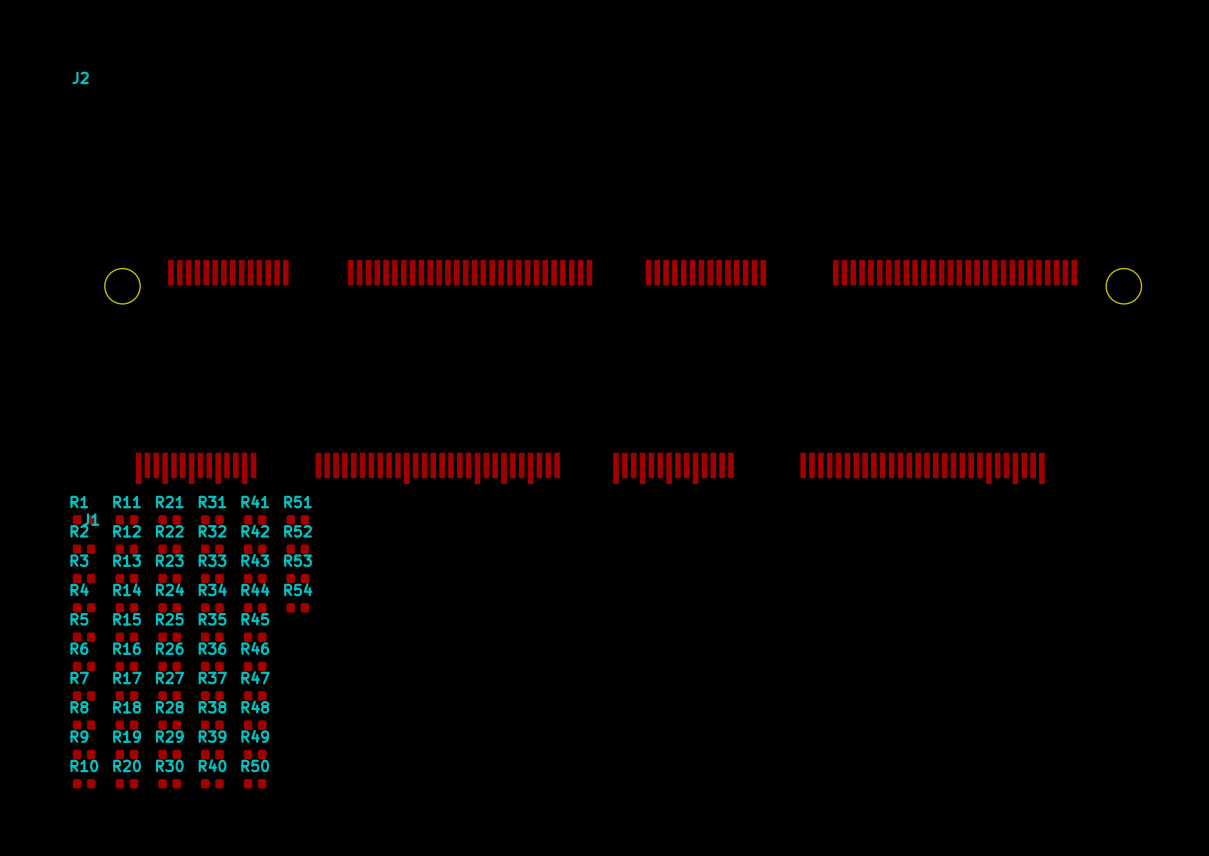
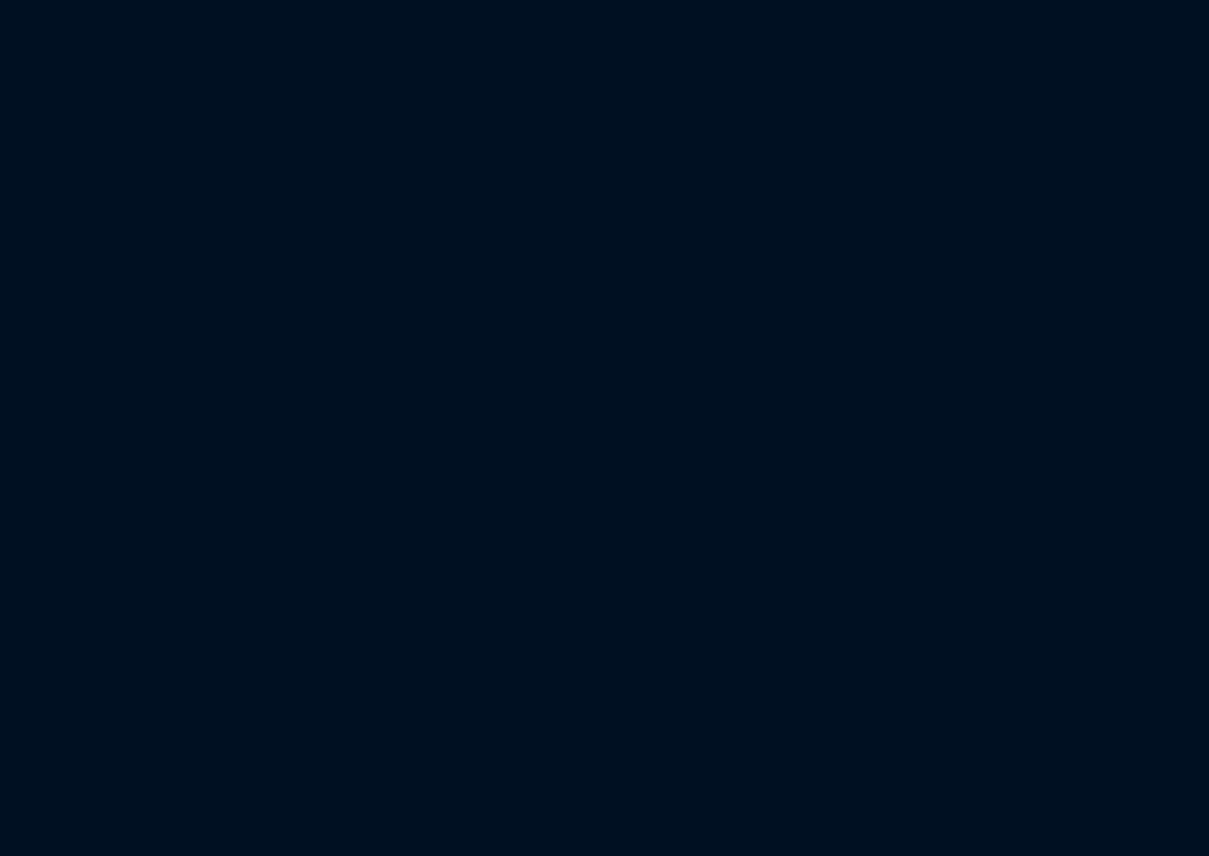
J2: (623, 281) -> none
J1: (590, 468) -> none
R1: (84, 519) -> none
R11: (126, 519) -> none
R21: (169, 519) -> none
R31: (212, 519) -> none
R41: (255, 519) -> none
R51: (297, 519) -> none
R2: (84, 549) -> none
R12: (126, 549) -> none
R22: (169, 549) -> none
R32: (212, 549) -> none
R42: (255, 549) -> none
R52: (297, 549) -> none
R3: (84, 578) -> none
R13: (126, 578) -> none
R23: (169, 578) -> none
R33: (212, 578) -> none
R43: (255, 578) -> none
R53: (297, 578) -> none
R4: (84, 607) -> none
R14: (126, 607) -> none
R24: (169, 607) -> none
R34: (212, 607) -> none
R44: (255, 607) -> none
R54: (297, 607) -> none
R5: (84, 637) -> none
R15: (126, 637) -> none
R25: (169, 637) -> none
R35: (212, 637) -> none
R45: (255, 637) -> none
R6: (84, 666) -> none
R16: (126, 666) -> none
R26: (169, 666) -> none
R36: (212, 666) -> none
R46: (255, 666) -> none
R7: (84, 695) -> none
R17: (126, 695) -> none
R27: (169, 695) -> none
R37: (212, 695) -> none
R47: (255, 695) -> none
R8: (84, 725) -> none
R18: (126, 725) -> none
R28: (169, 725) -> none
R38: (212, 725) -> none
R48: (255, 725) -> none
R9: (84, 754) -> none
R19: (126, 754) -> none
R29: (169, 754) -> none
R39: (212, 754) -> none
R49: (255, 754) -> none
R10: (84, 783) -> none
R20: (126, 783) -> none
R30: (169, 783) -> none
R40: (212, 783) -> none
R50: (255, 783) -> none

